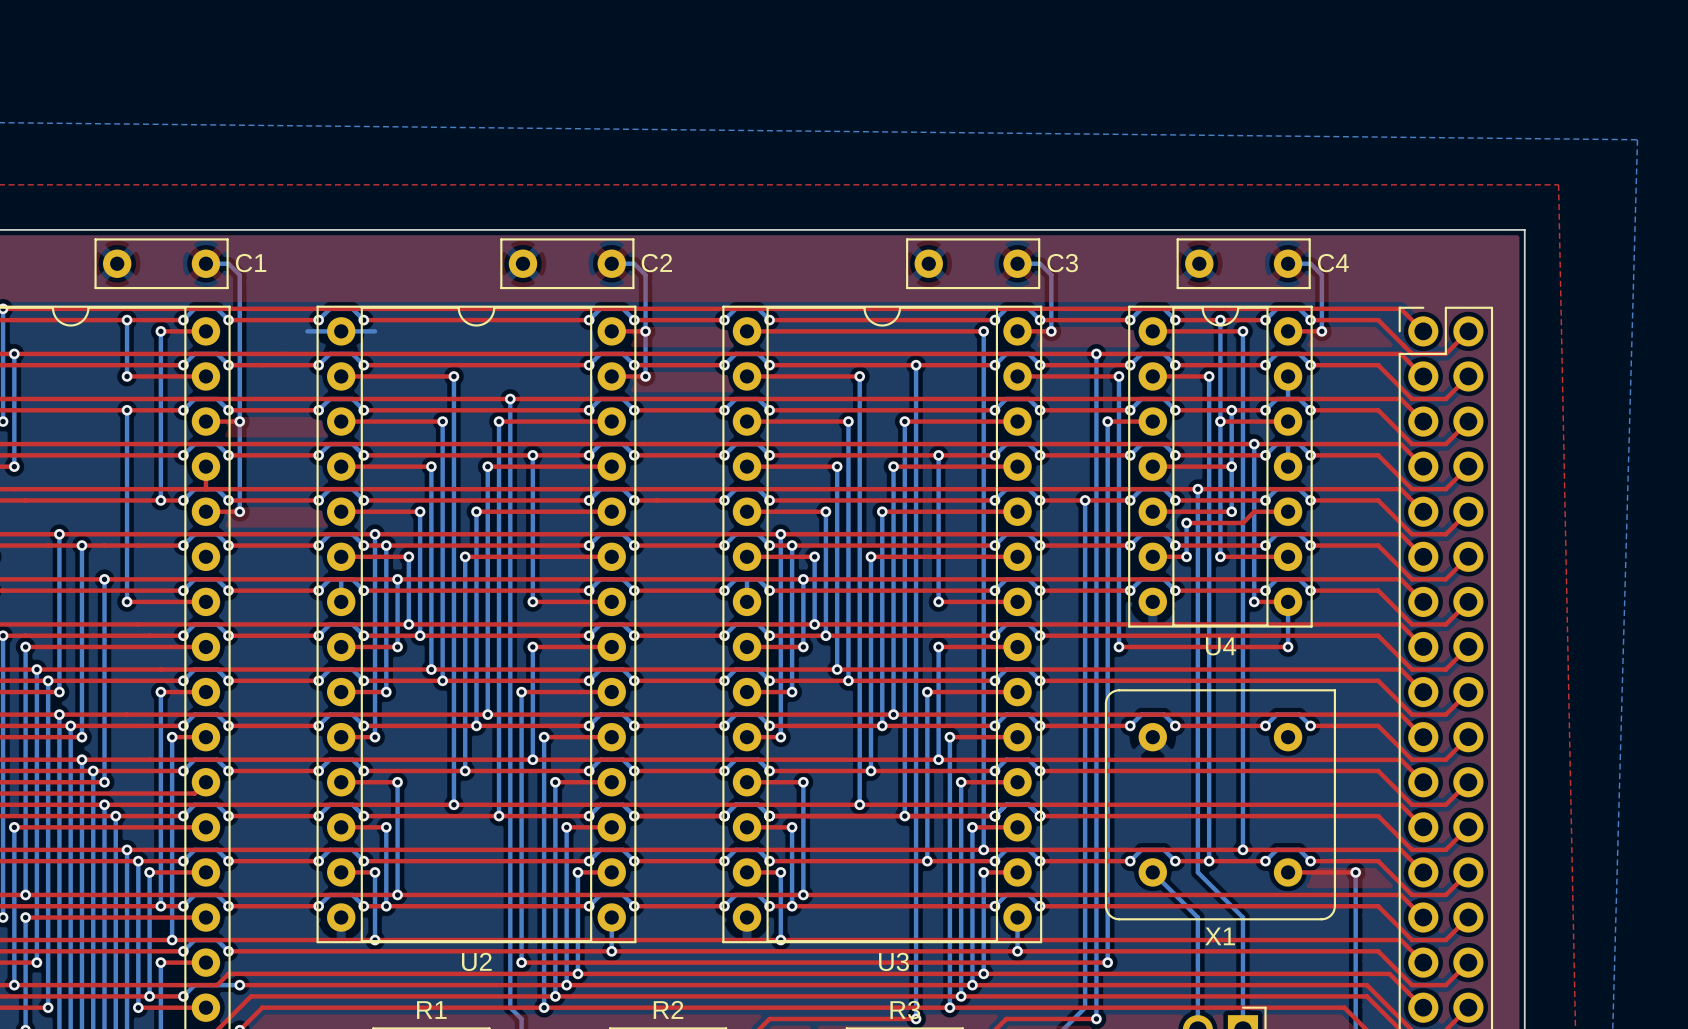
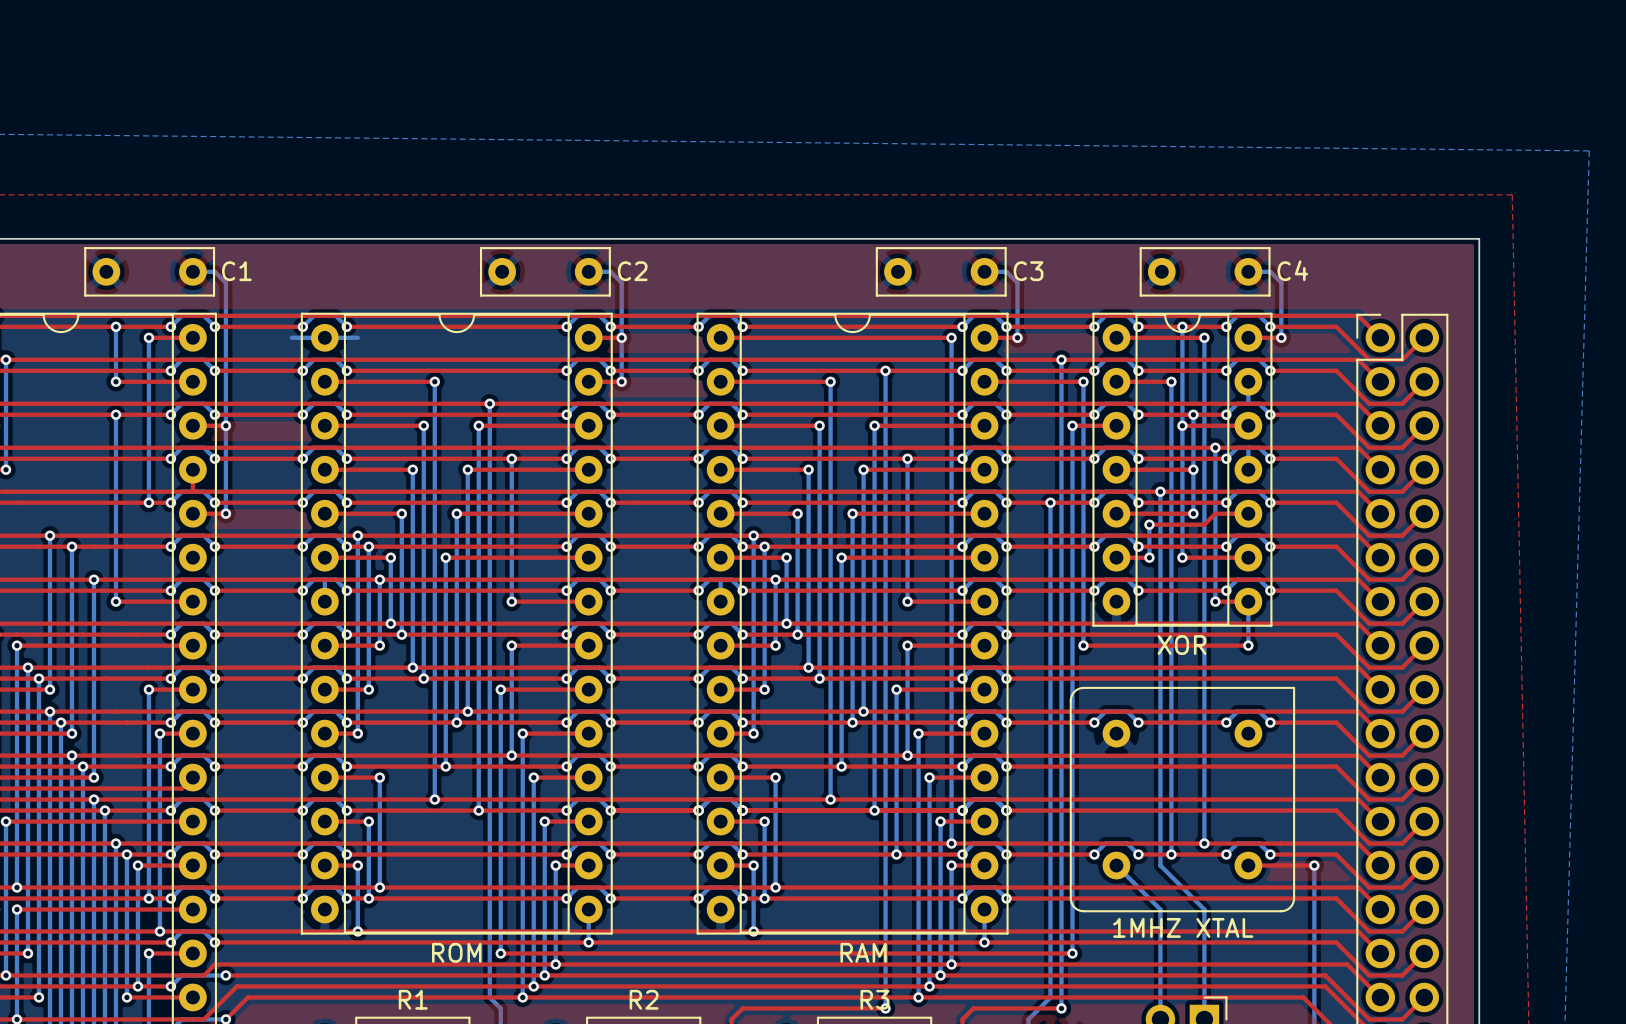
U4 name: U4 (1221, 646) -> XOR (1182, 645)
X1 name: X1 (1220, 936) -> 1MHZ XTAL (1183, 927)
U2 name: U2 (476, 961) -> ROM (456, 952)
U3 name: U3 (893, 961) -> RAM (863, 952)

